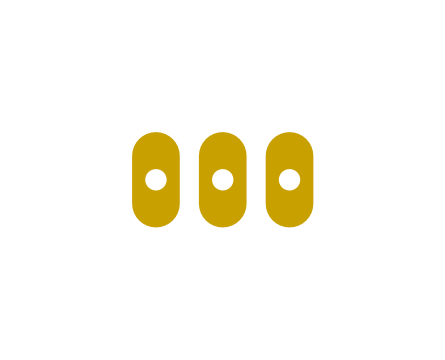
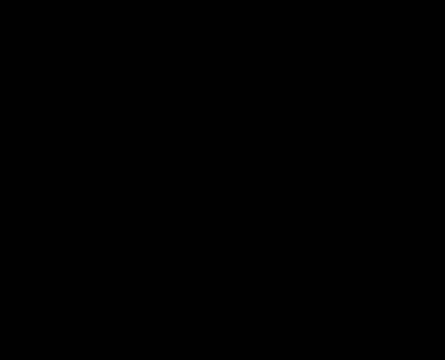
part: (222, 179) -> none

